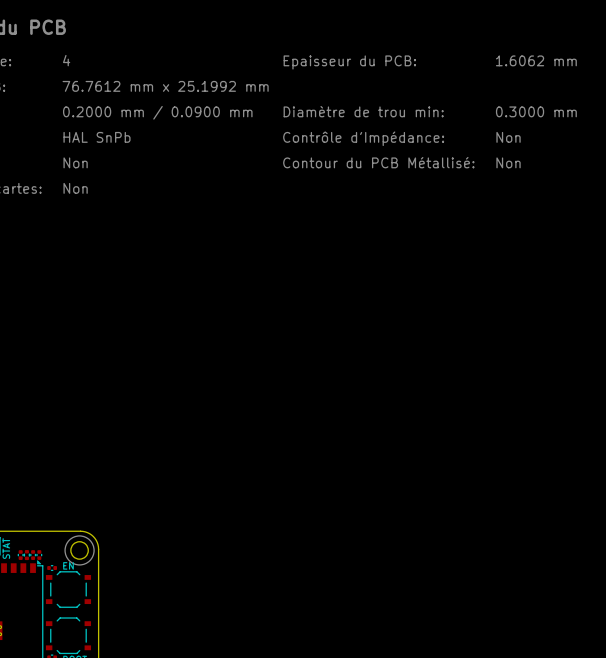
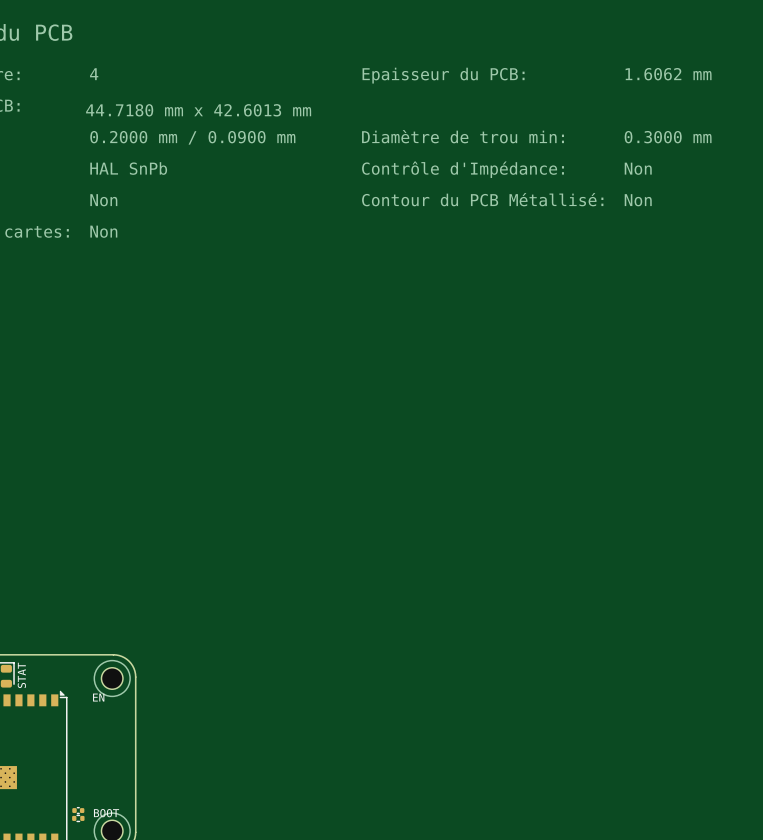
text: 76.7612 mm x 25.1992 mm (165, 86) -> 44.7180 mm x 42.6013 mm (198, 110)
part: (20, 555) -> none
part: (26, 555) -> none
part: (33, 555) -> none
part: (39, 555) -> none
part: (52, 568) -> none
part: (68, 589) -> none
part: (68, 635) -> none

